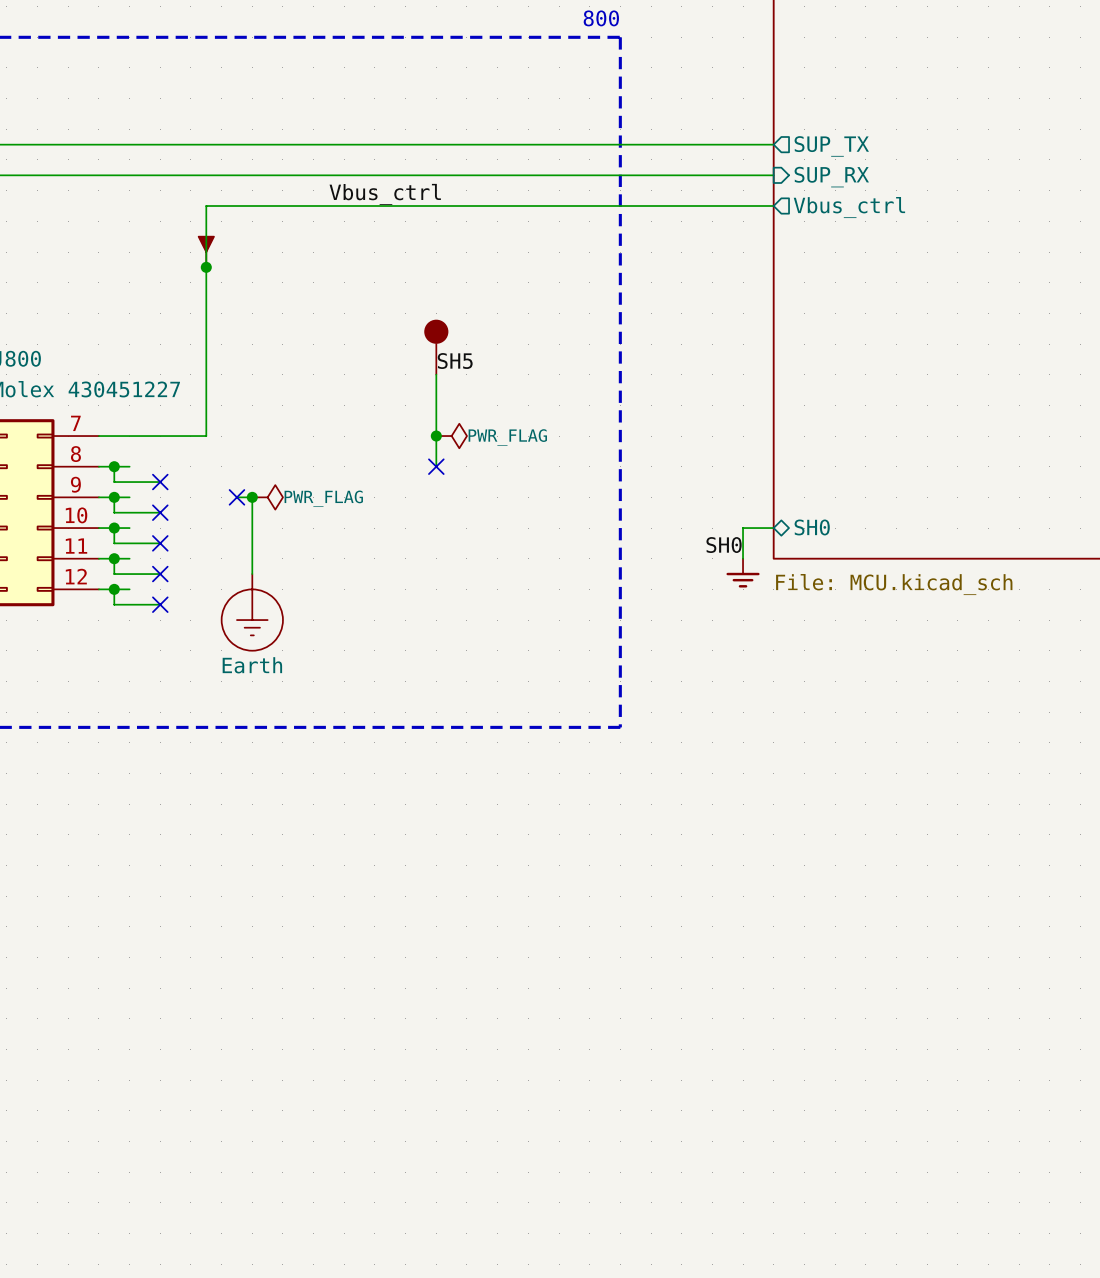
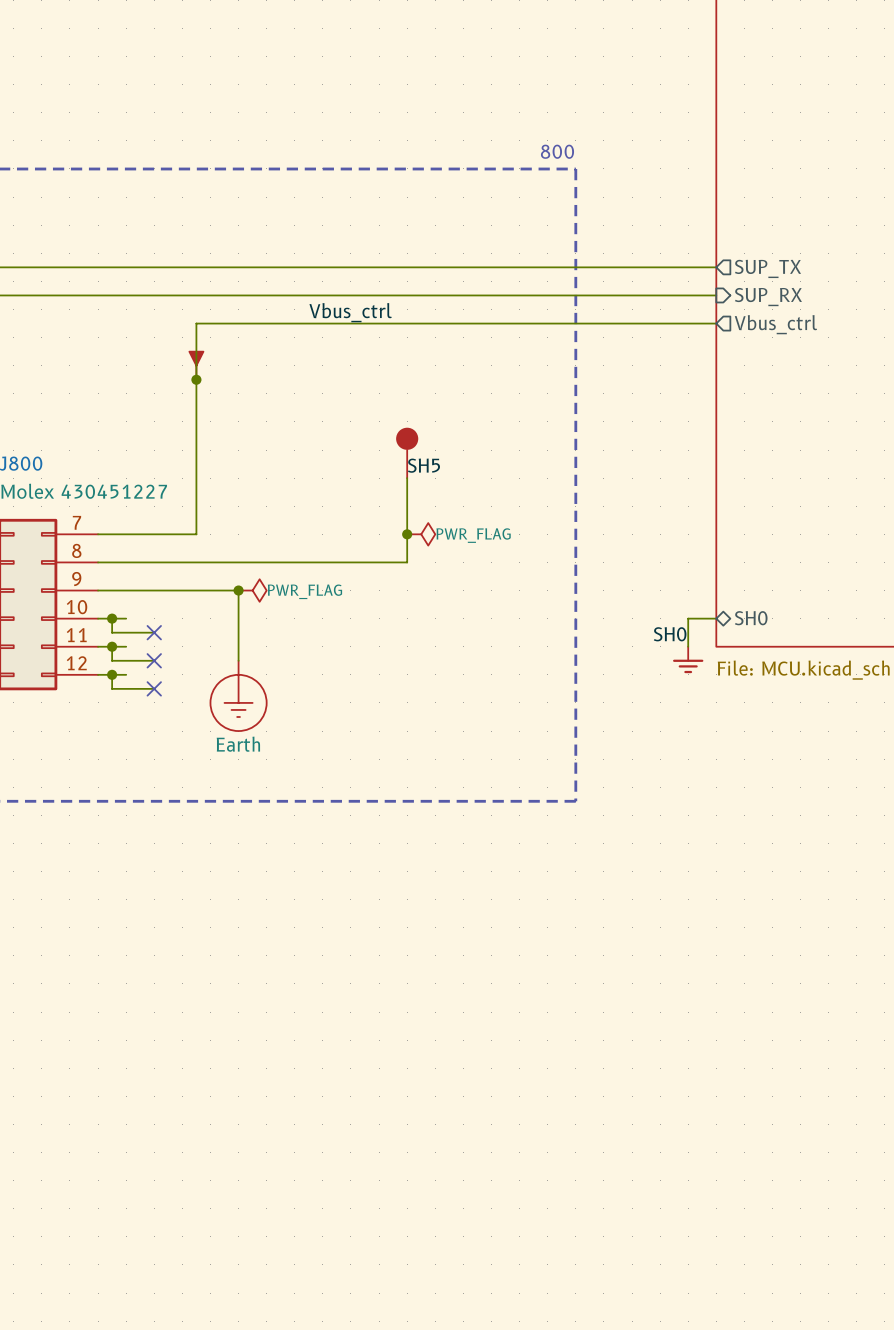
wire: (114, 466) (114, 482) (160, 482) -> none
junction: (114, 466) -> none
wire: none -> (126, 562) (407, 562)
no-connect mark: (436, 466) -> none
no-connect mark: (160, 482) -> none
wire: (114, 497) (114, 512) (160, 512) -> none
junction: (114, 497) -> none
wire: none -> (126, 590) (224, 590)
no-connect mark: (236, 497) -> none
no-connect mark: (160, 512) -> none

